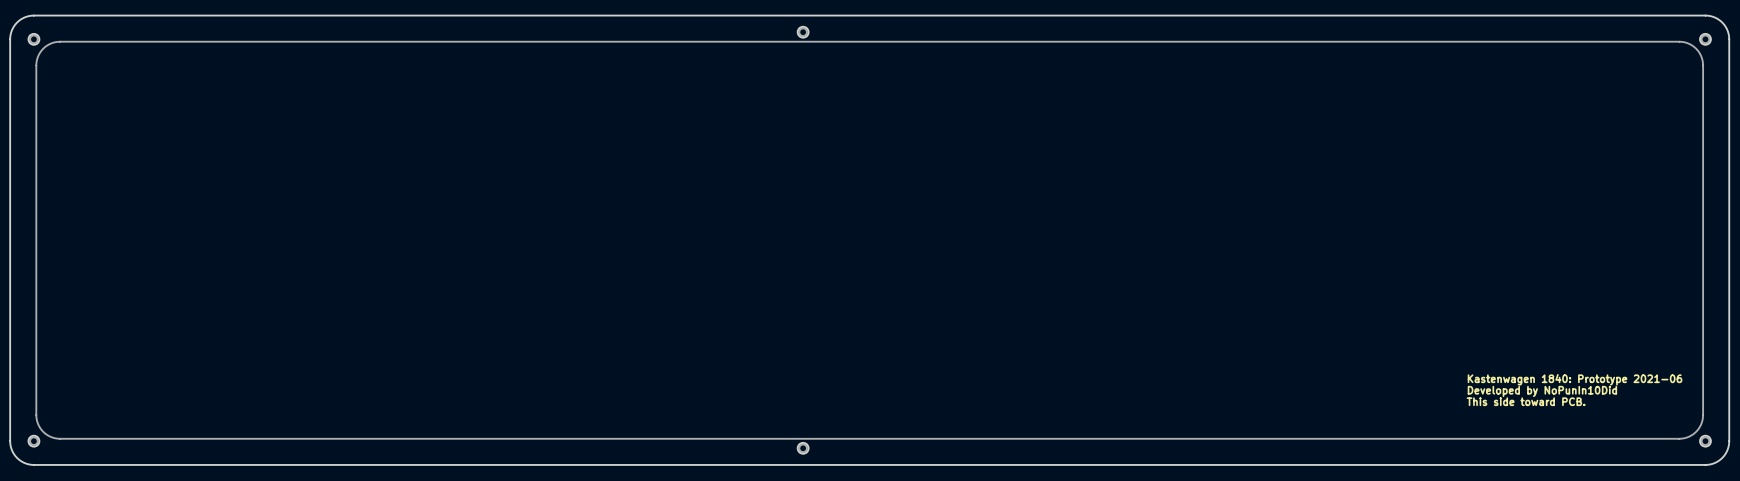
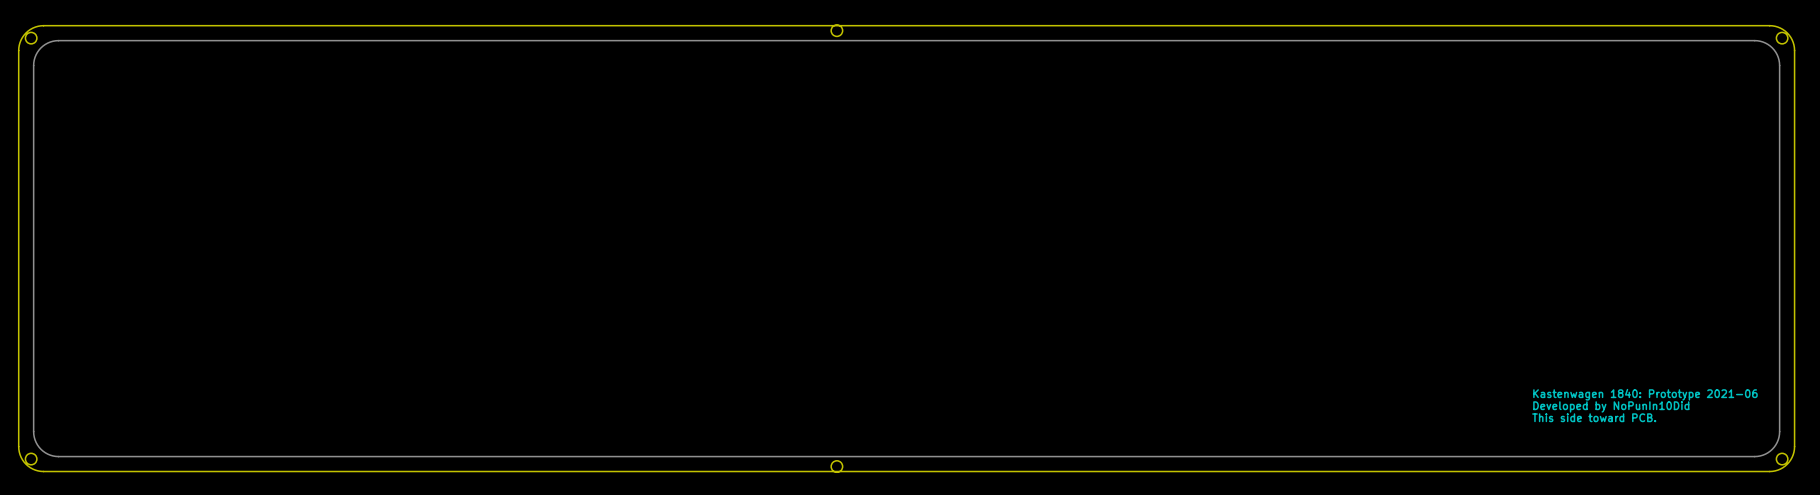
board edge: (33, 15) (1710, 16) (1724, 24) (1729, 39) (1728, 446) (1720, 459) (1705, 464) (28, 464) (15, 456) (10, 441) (10, 39) (12, 29) (17, 22) (26, 16) (33, 15) -> (43, 25) (35, 27) (26, 32) (21, 39) (18, 50) (18, 446) (24, 462) (38, 470) (1769, 471) (1785, 466) (1793, 452) (1794, 50) (1789, 35) (1775, 26) (43, 25)
drawing: [798, 28, 808, 37] -> none
drawing: [29, 35, 39, 44] -> none
drawing: [1701, 35, 1710, 44] -> none
drawing: [29, 437, 39, 446] -> none
drawing: [1701, 437, 1710, 446] -> none
drawing: [798, 444, 808, 453] -> none

